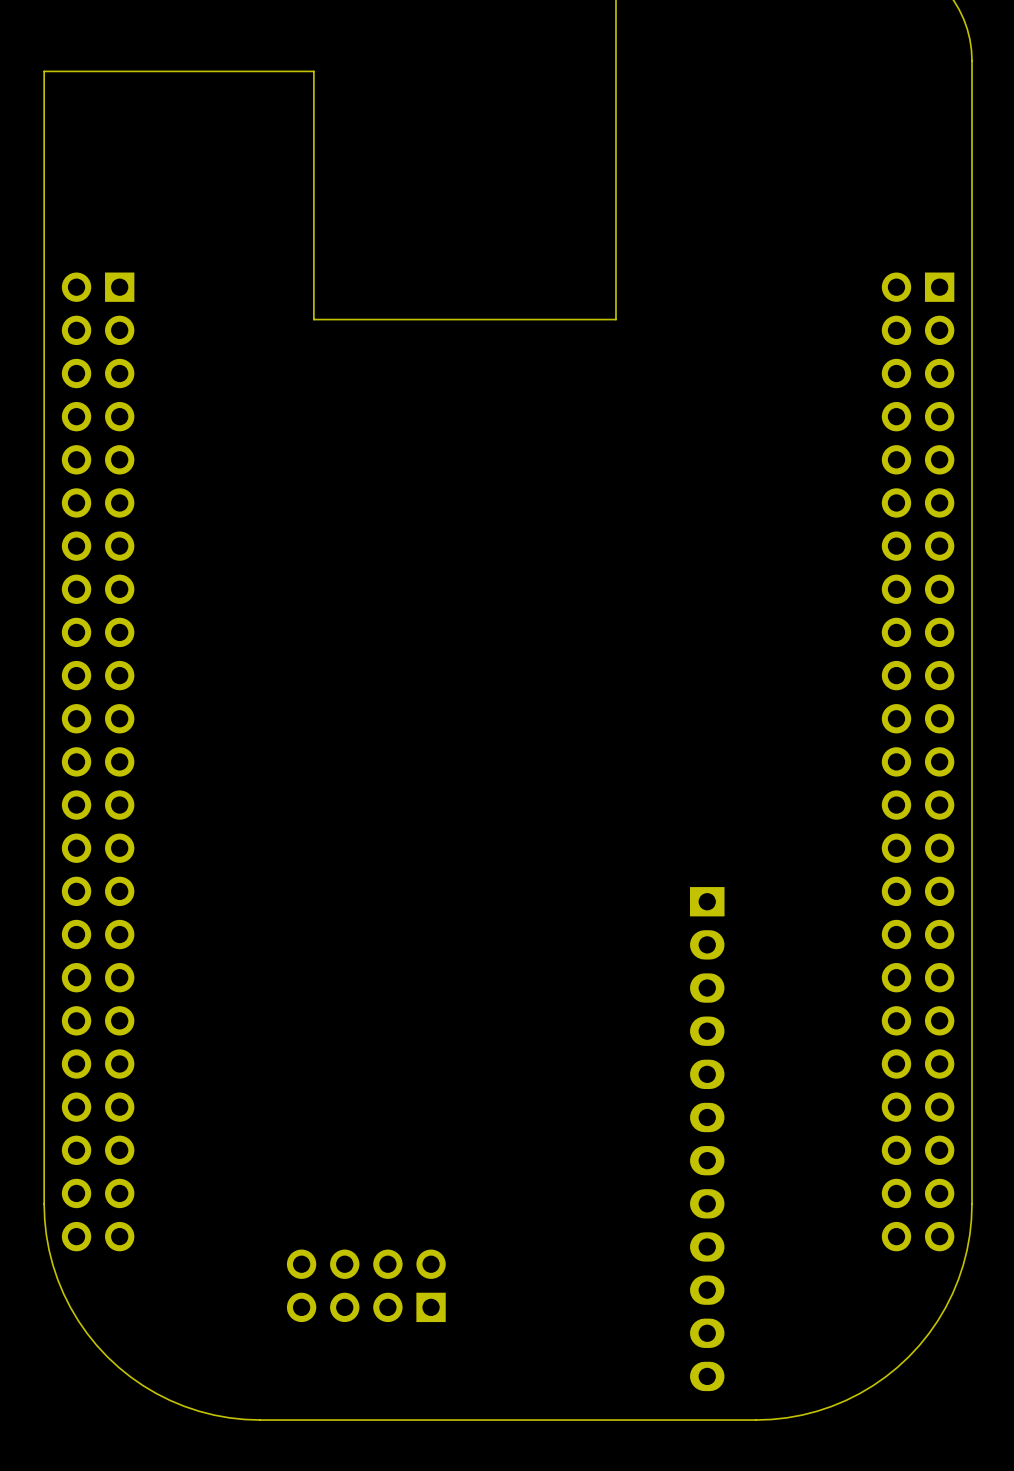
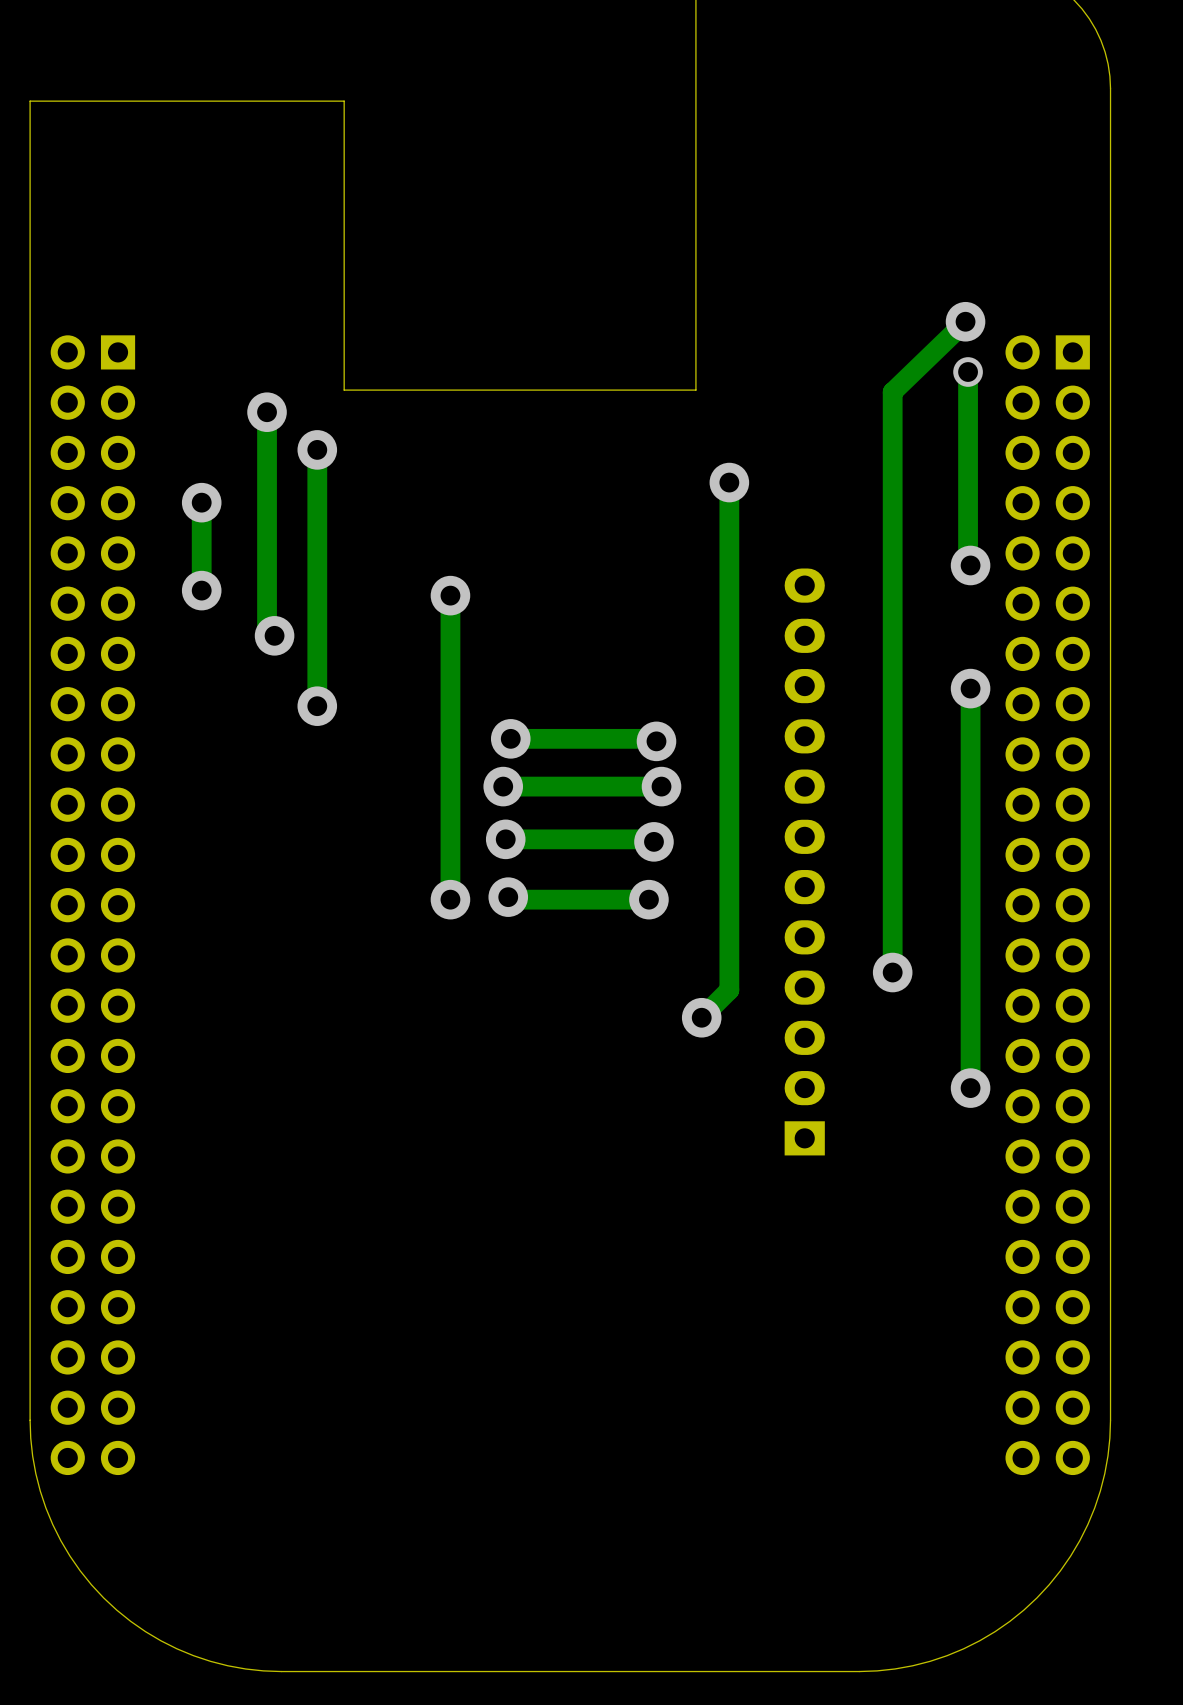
track: none -> (965, 321) (892, 392) (892, 972)
via: none -> (965, 321)
track: none -> (968, 372) (968, 562) (970, 565)
via: none -> (968, 372)
track: none -> (267, 412) (267, 628)
via: none -> (267, 412)
track: none -> (317, 449) (317, 706)
via: none -> (317, 449)
track: none -> (729, 482) (729, 990) (701, 1017)
via: none -> (729, 482)
track: none -> (201, 502) (201, 590)
via: none -> (201, 502)
via: none -> (970, 565)
via: none -> (201, 590)
track: none -> (450, 595) (450, 899)
via: none -> (450, 595)
via: none -> (274, 635)
track: none -> (970, 688) (970, 1088)
via: none -> (970, 688)
via: none -> (317, 706)
track: none -> (510, 738) (653, 738) (656, 741)
via: none -> (510, 738)
via: none -> (656, 741)
via: none -> (503, 786)
track: none -> (661, 786) (503, 786)
via: none -> (661, 786)
track: none -> (505, 839) (651, 839) (653, 841)
via: none -> (505, 839)
via: none -> (653, 841)
track: none -> (508, 897) (510, 899) (648, 899)
via: none -> (508, 897)
via: none -> (450, 899)
via: none -> (648, 899)
via: none -> (892, 972)
via: none -> (701, 1017)
via: none -> (970, 1088)
part rotation: 0° (707, 1139) -> 180° (804, 861)
part position: (707, 1139) -> (804, 861)
part: (366, 1285) -> none

